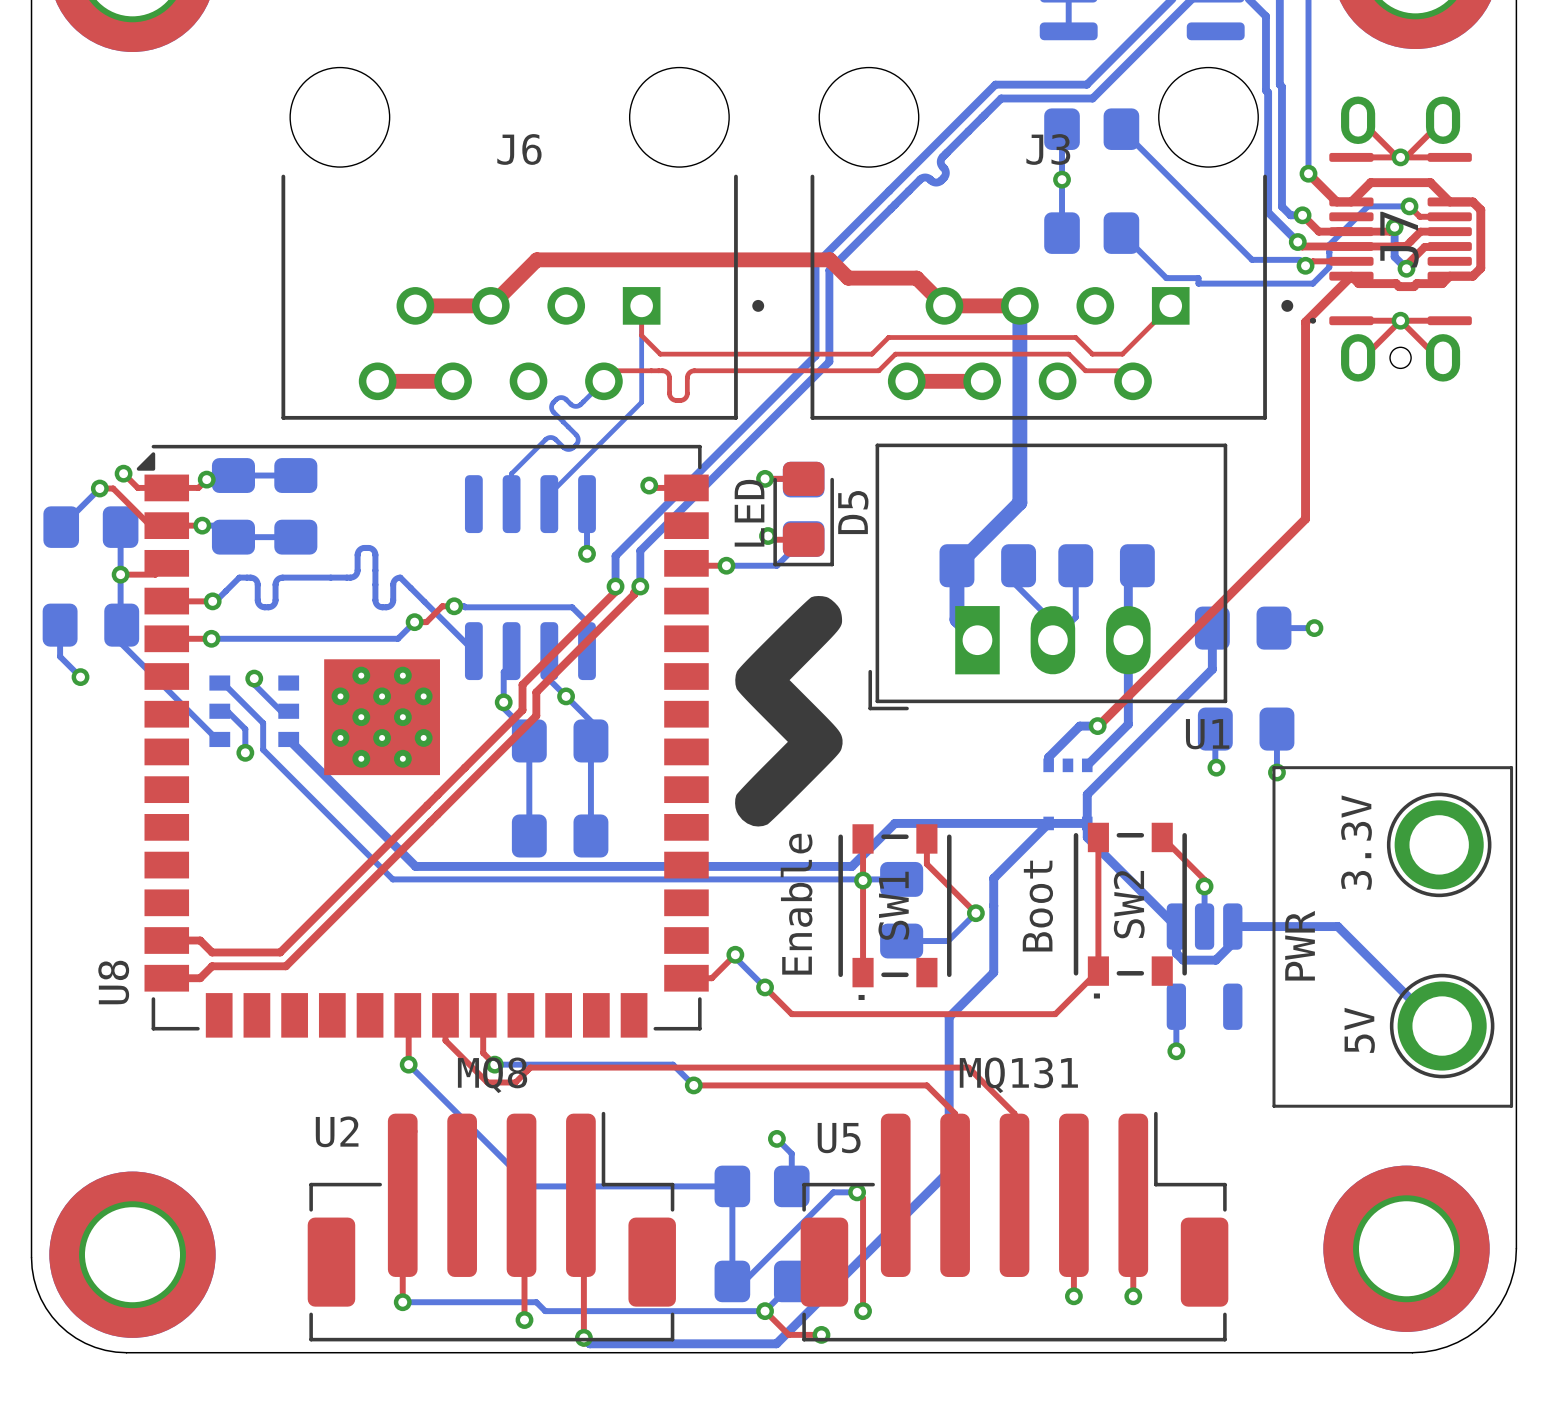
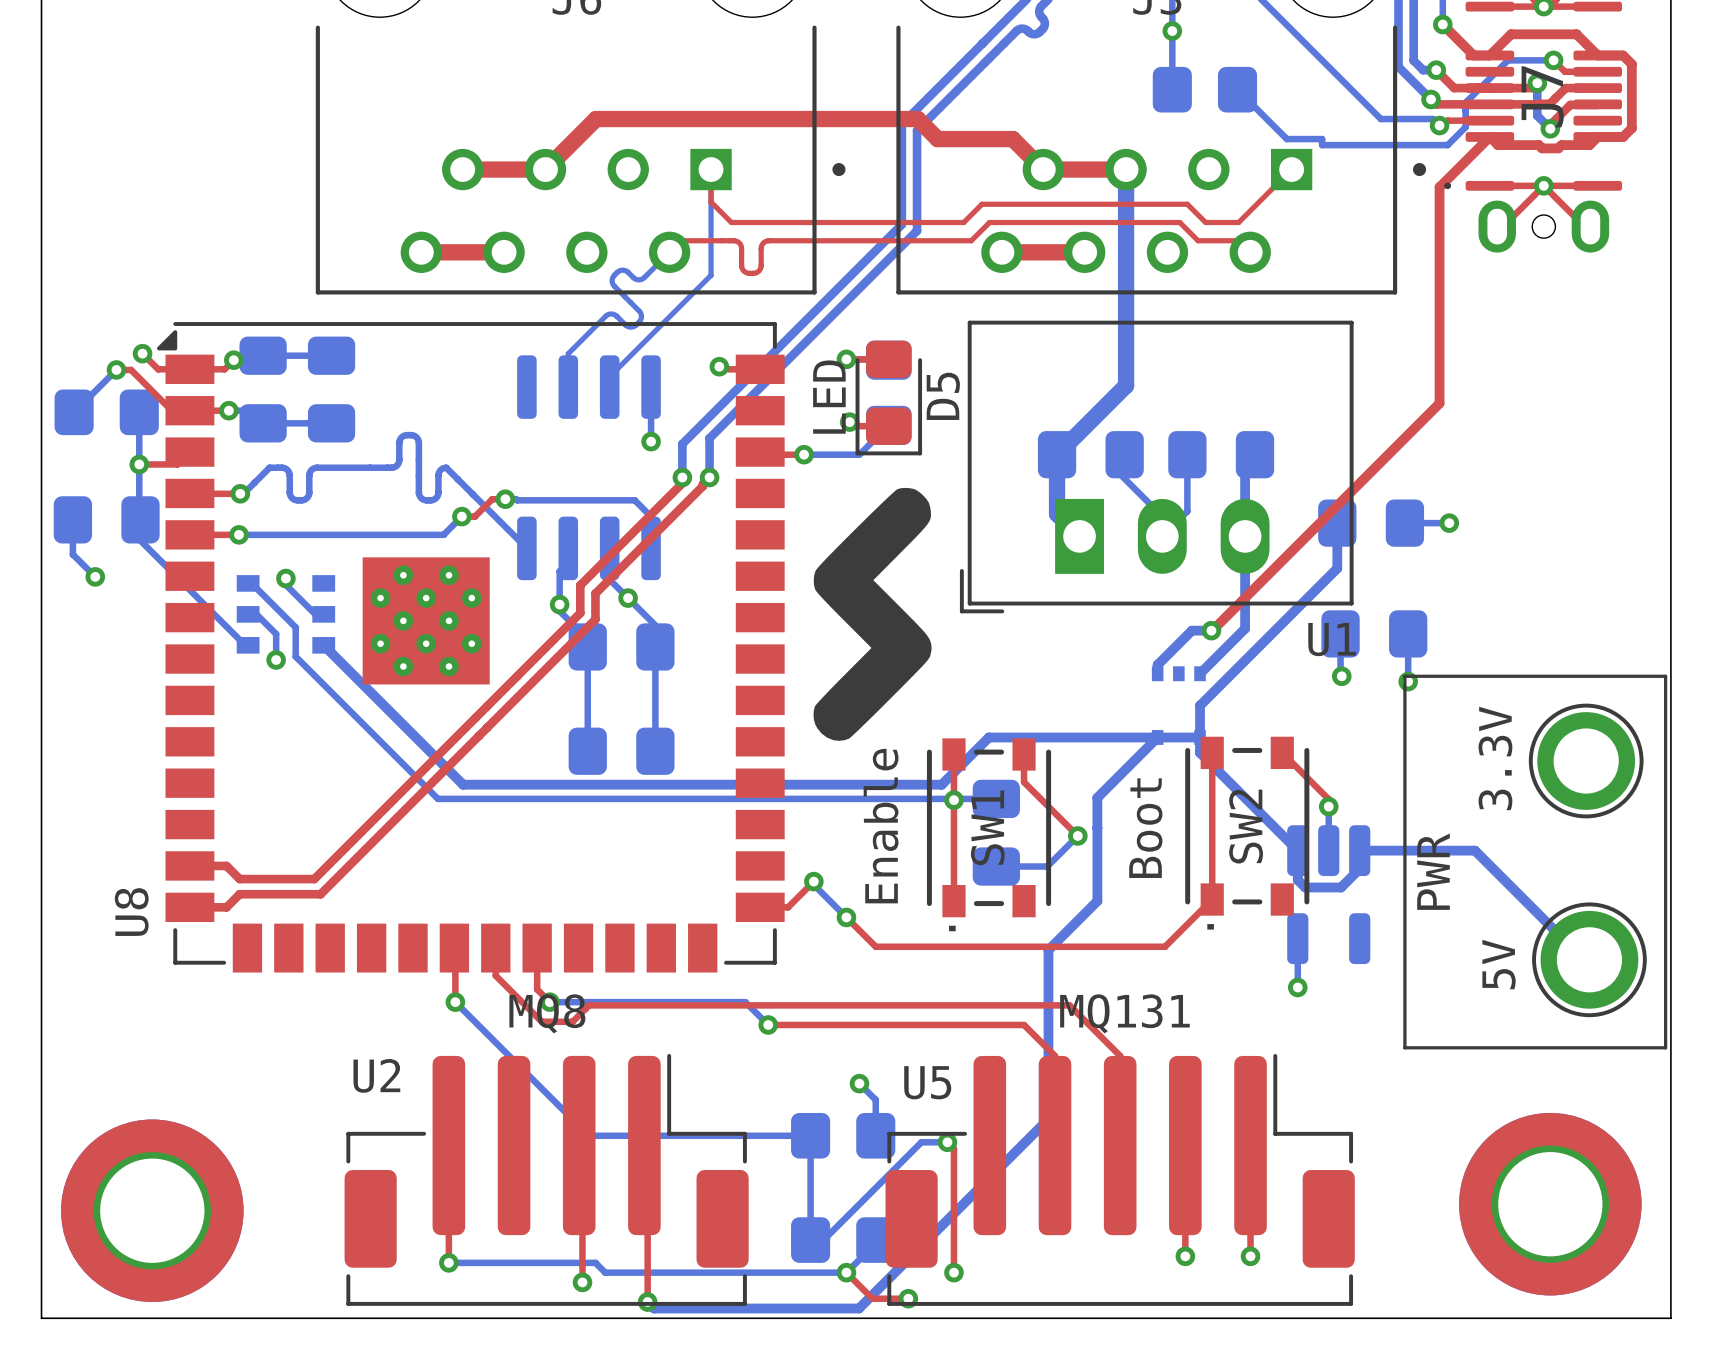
board edge: (1516, 1248) (1513, 1271) (1506, 1293) (1485, 1322) (1457, 1342) (1435, 1350) (1412, 1352) -> (1670, 1204) (1670, 1318) (1556, 1318)
board edge: (31, 1257) (36, 1289) (46, 1308) (59, 1324) (75, 1338) (95, 1347) (126, 1352) -> (41, 1213) (41, 1318) (145, 1318)

